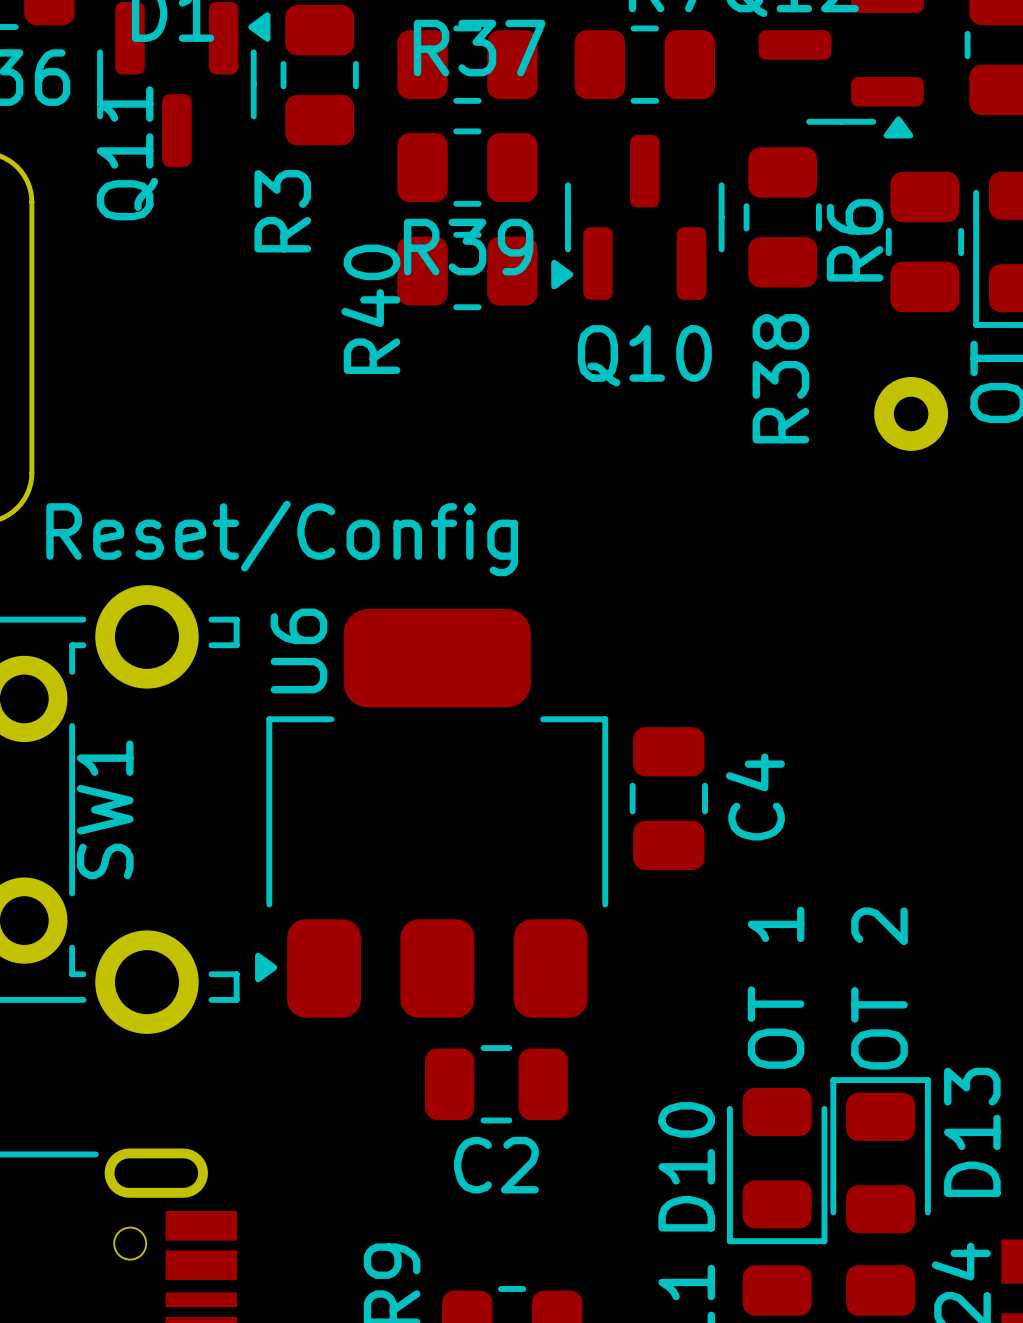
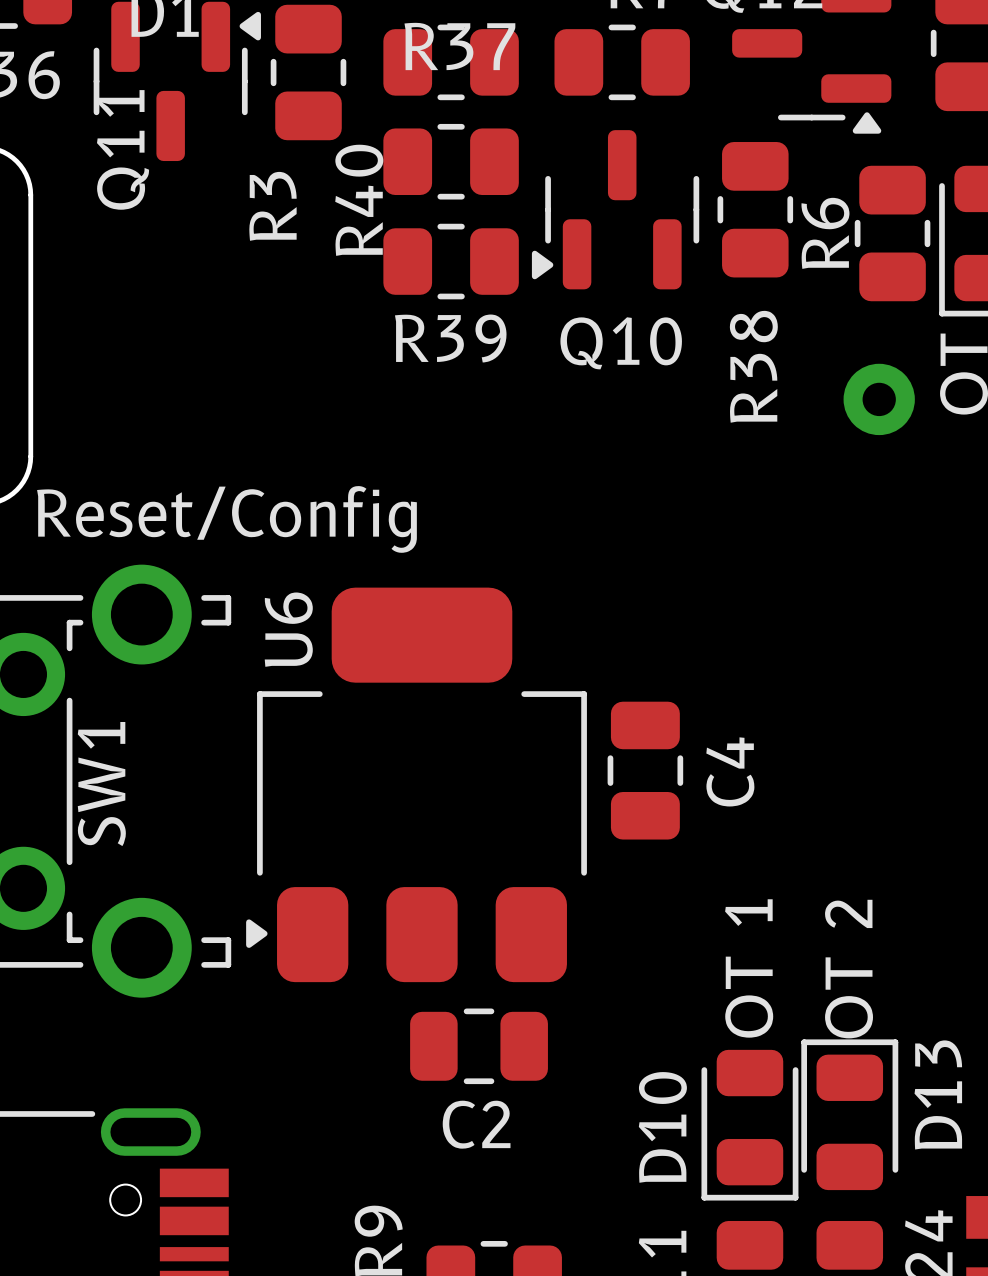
R39 name: R39 (468, 247) -> R40 (359, 200)
R40 name: R40 (370, 309) -> R39 (450, 338)

